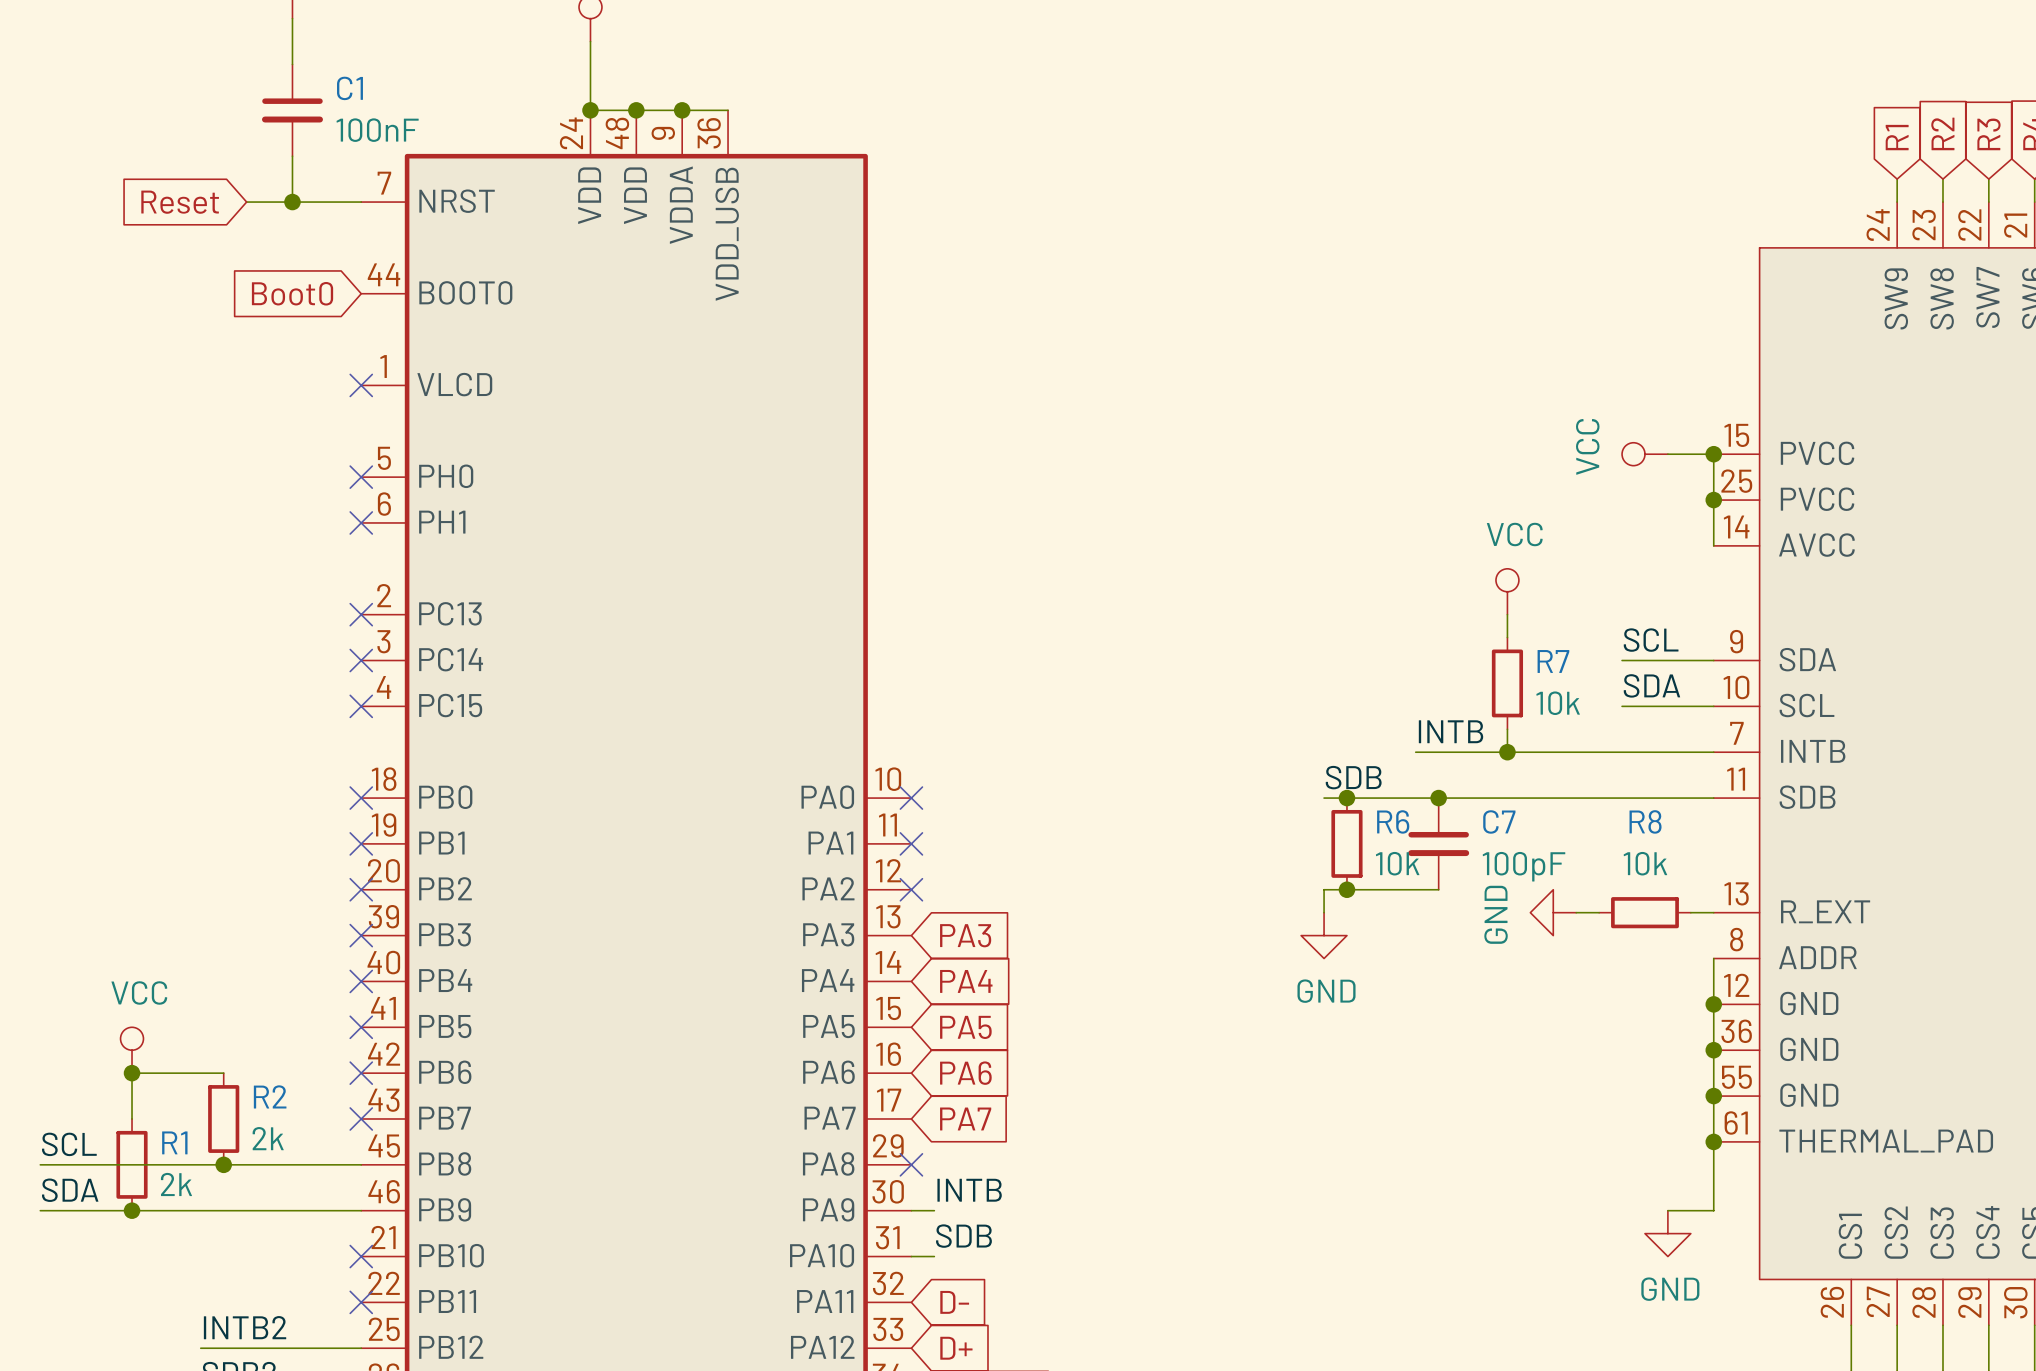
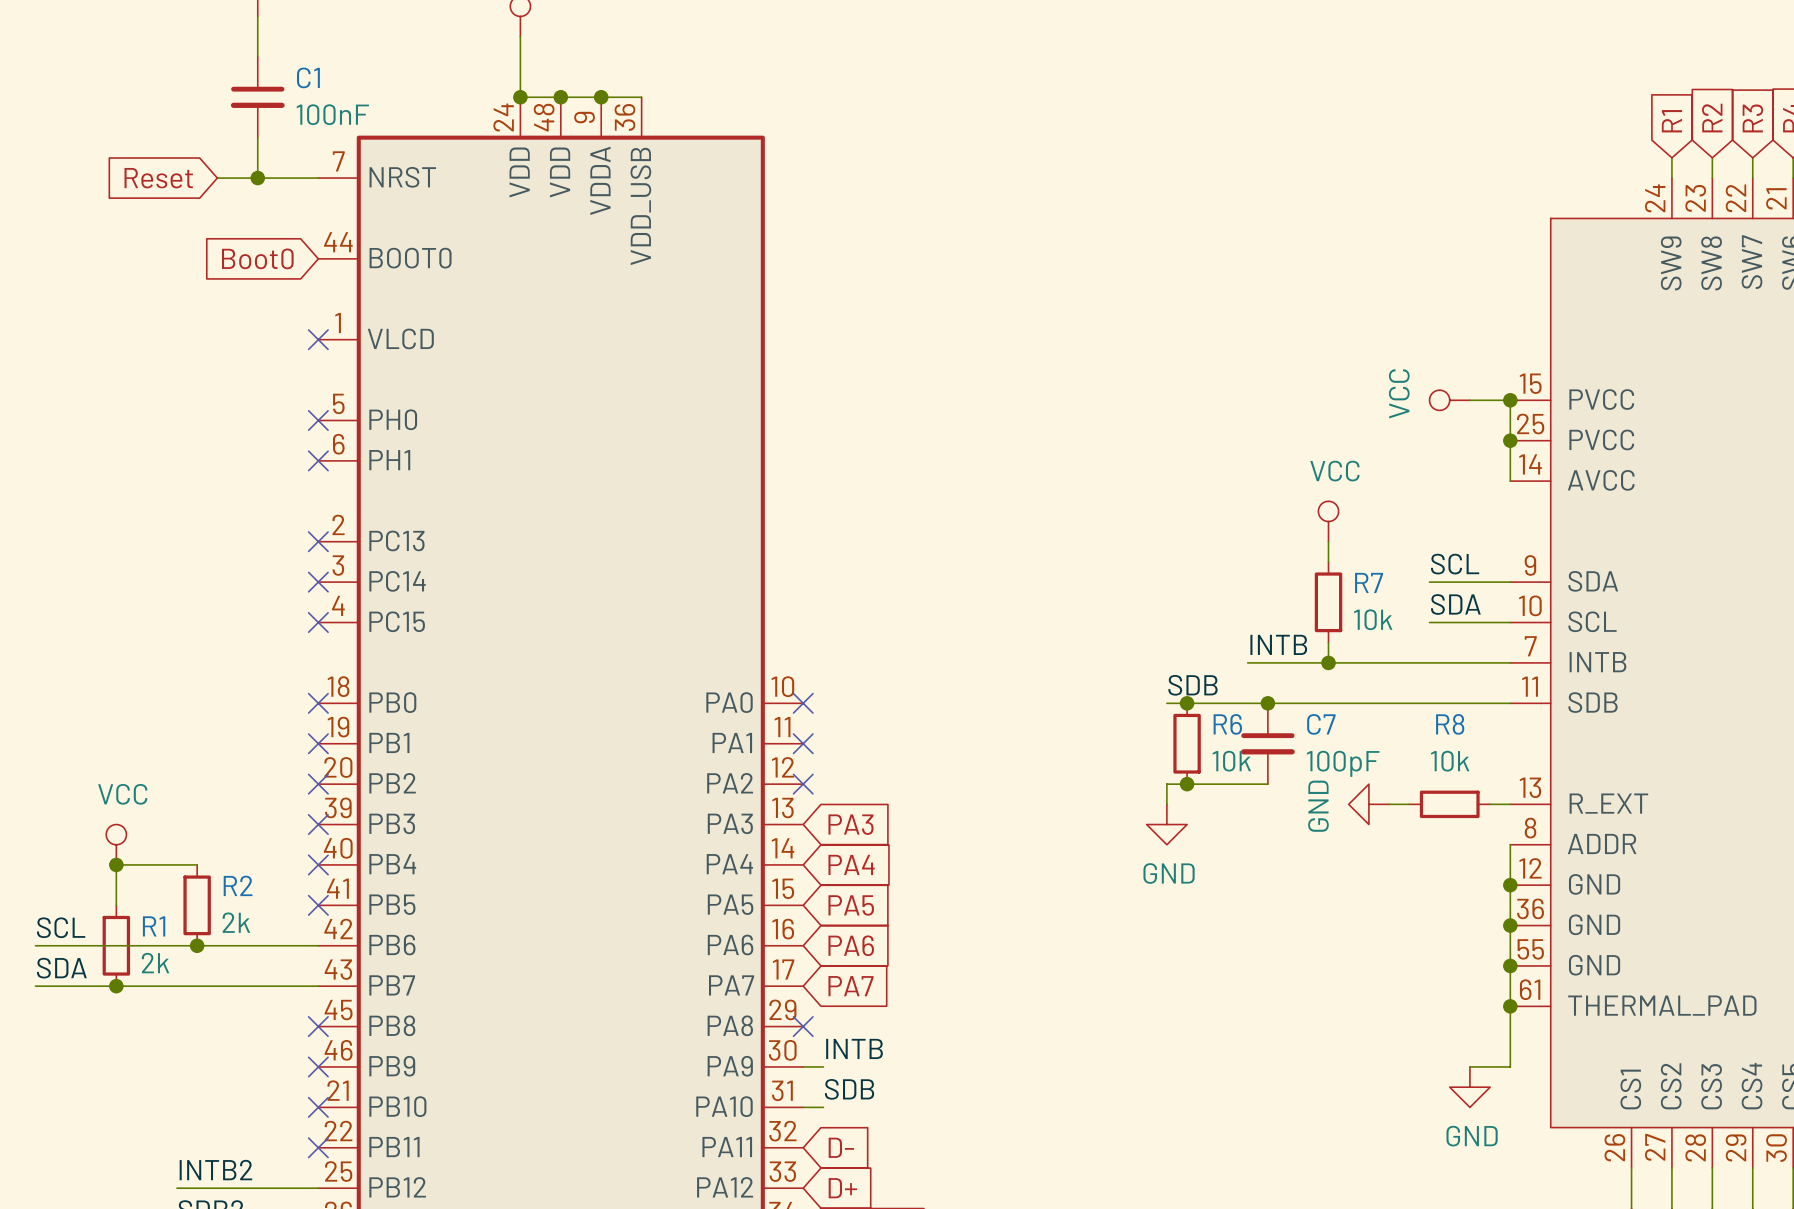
junction: none -> (116, 864)
wire: none -> (197, 864) (116, 864) (116, 905)
power symbol position: VCC (132, 1050) -> VCC (116, 844)
wire: (132, 1073) (132, 1118) -> (116, 945) (35, 945)
junction: (132, 1073) -> none
wire: none -> (197, 945) (318, 945)
junction: none -> (197, 945)
no-connect mark: (361, 1073) -> none
junction: none -> (116, 986)
R2 position: (223, 1118) -> (197, 905)
no-connect mark: (361, 1118) -> none
label position: SCL (69, 1144) -> SCL (61, 927)
wire: (40, 1164) (361, 1164) -> (35, 986) (318, 986)
R1 position: (132, 1164) -> (116, 945)
junction: (223, 1164) -> none
no-connect mark: none -> (318, 1026)
label position: SDA (70, 1190) -> SDA (61, 968)
wire: (40, 1210) (361, 1210) -> none
junction: (132, 1210) -> none
no-connect mark: none -> (318, 1066)

